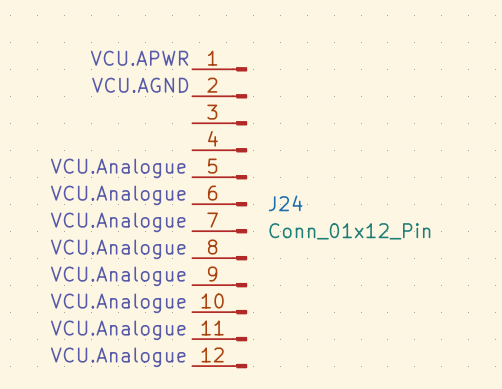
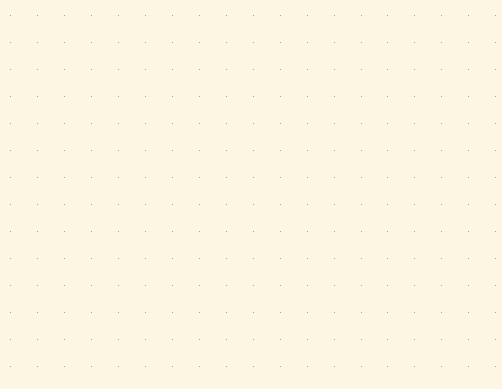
text: VCU.APWR (139, 58) -> none
text: VCU.AGND (140, 85) -> none
text: VCU.Analogue (118, 168) -> none
text: VCU.Analogue (118, 195) -> none
J24: Conn_01x12_Pin (219, 217) -> none
text: VCU.Analogue (118, 222) -> none
text: VCU.Analogue (118, 249) -> none
text: VCU.Analogue (118, 276) -> none
text: VCU.Analogue (118, 303) -> none
text: VCU.Analogue (118, 330) -> none
text: VCU.Analogue (118, 357) -> none

